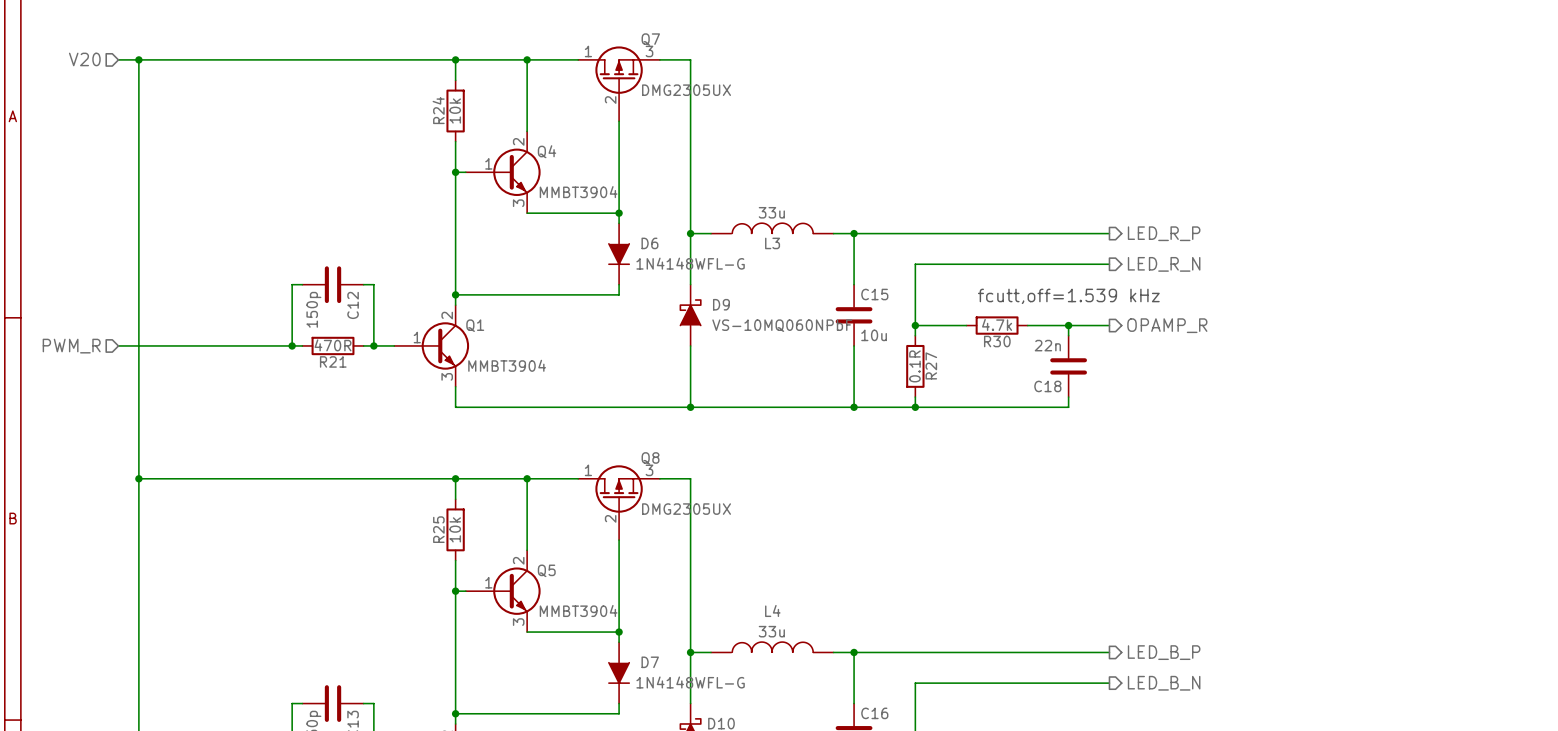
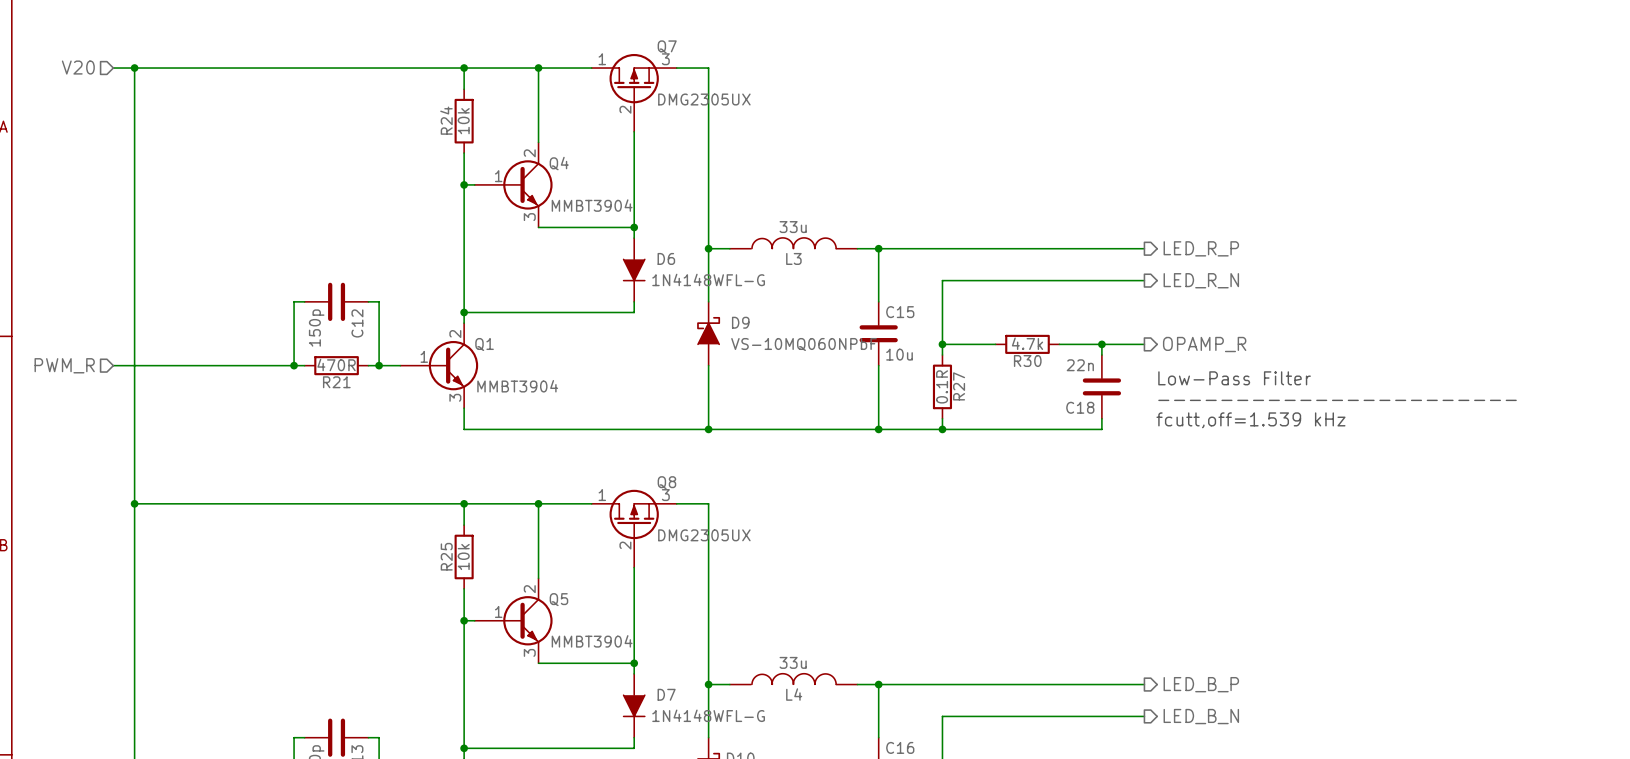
text position: fcutt,off=1.539 kHz (1068, 296) -> fcutt,off=1.539 kHz (1250, 420)
text: none -> Low-Pass Filter (1234, 378)
text: none -> ----------------------- (1337, 400)
L4 name position: L4 (772, 610) -> L4 (794, 694)

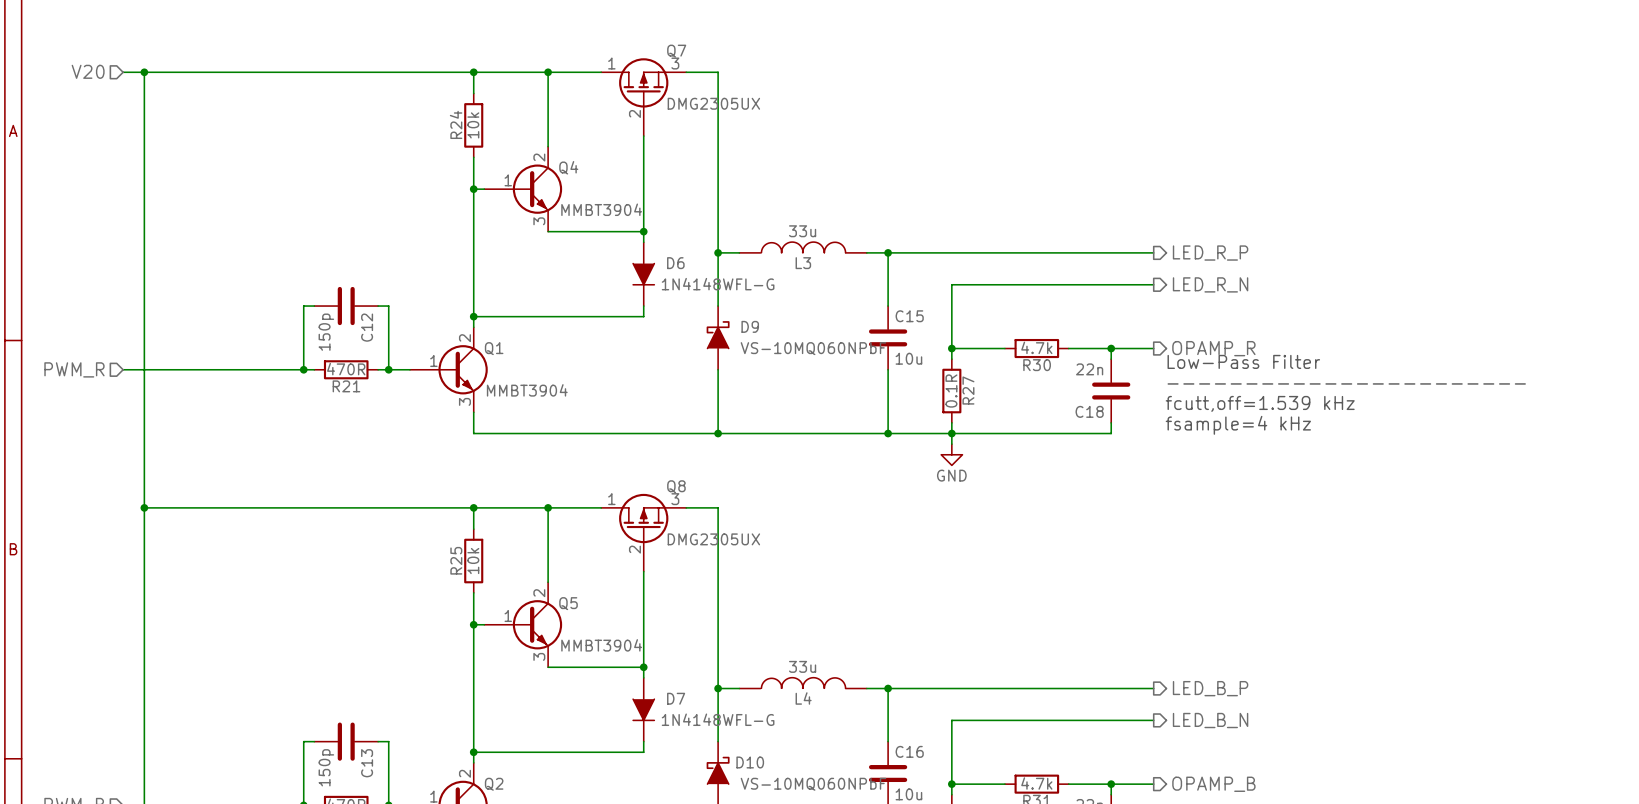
text: none -> Low-Pass Filter (1243, 361)
text: Low-Pass Filter (1234, 378) -> ----------------------- (1346, 383)
text: ----------------------- (1337, 400) -> fcutt,off=1.539 kHz (1260, 403)
text: fcutt,off=1.539 kHz (1250, 420) -> fsample=4 kHz (1238, 425)
wire: none -> (951, 433) (951, 444)
power symbol: none -> GND (951, 454)

